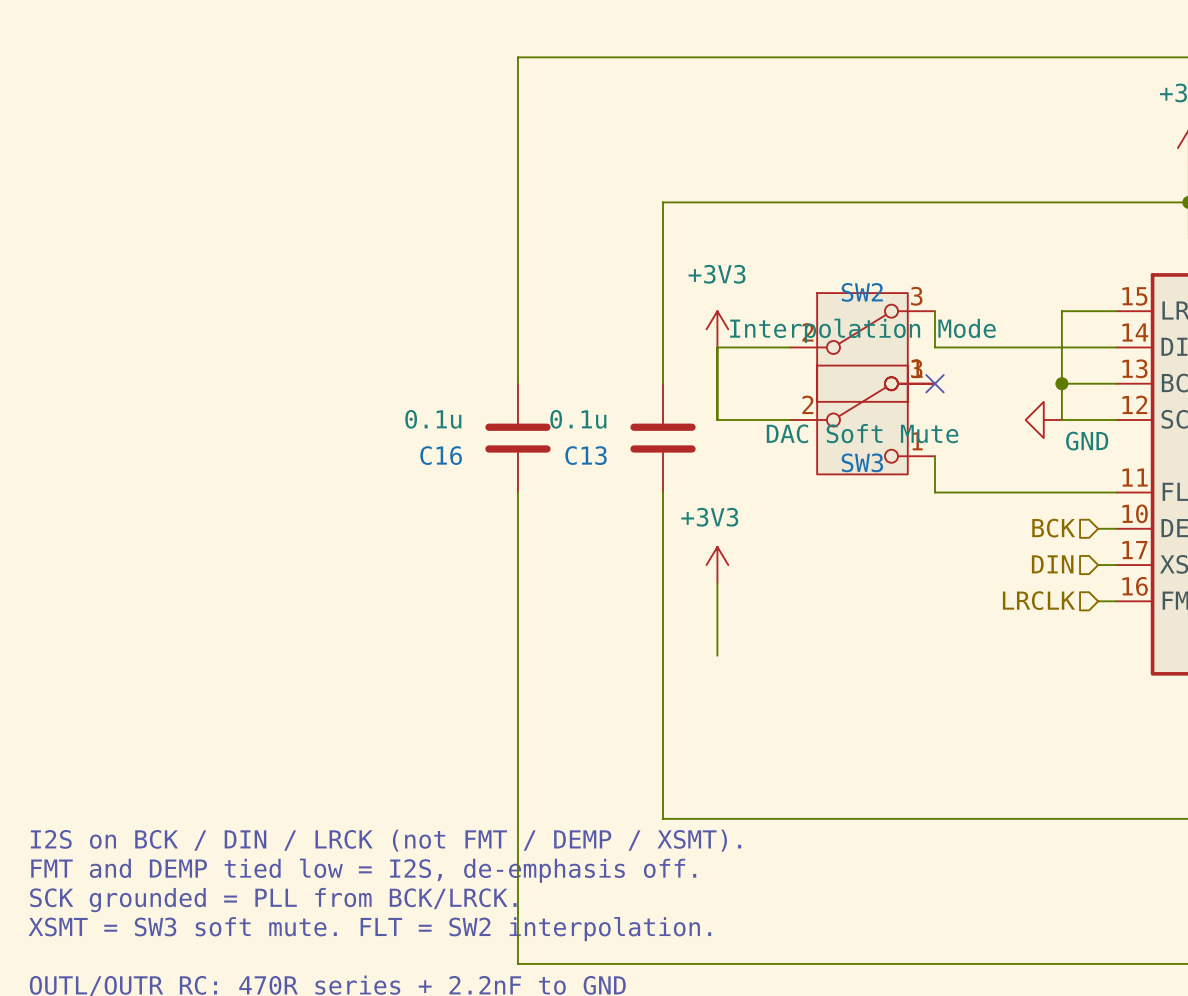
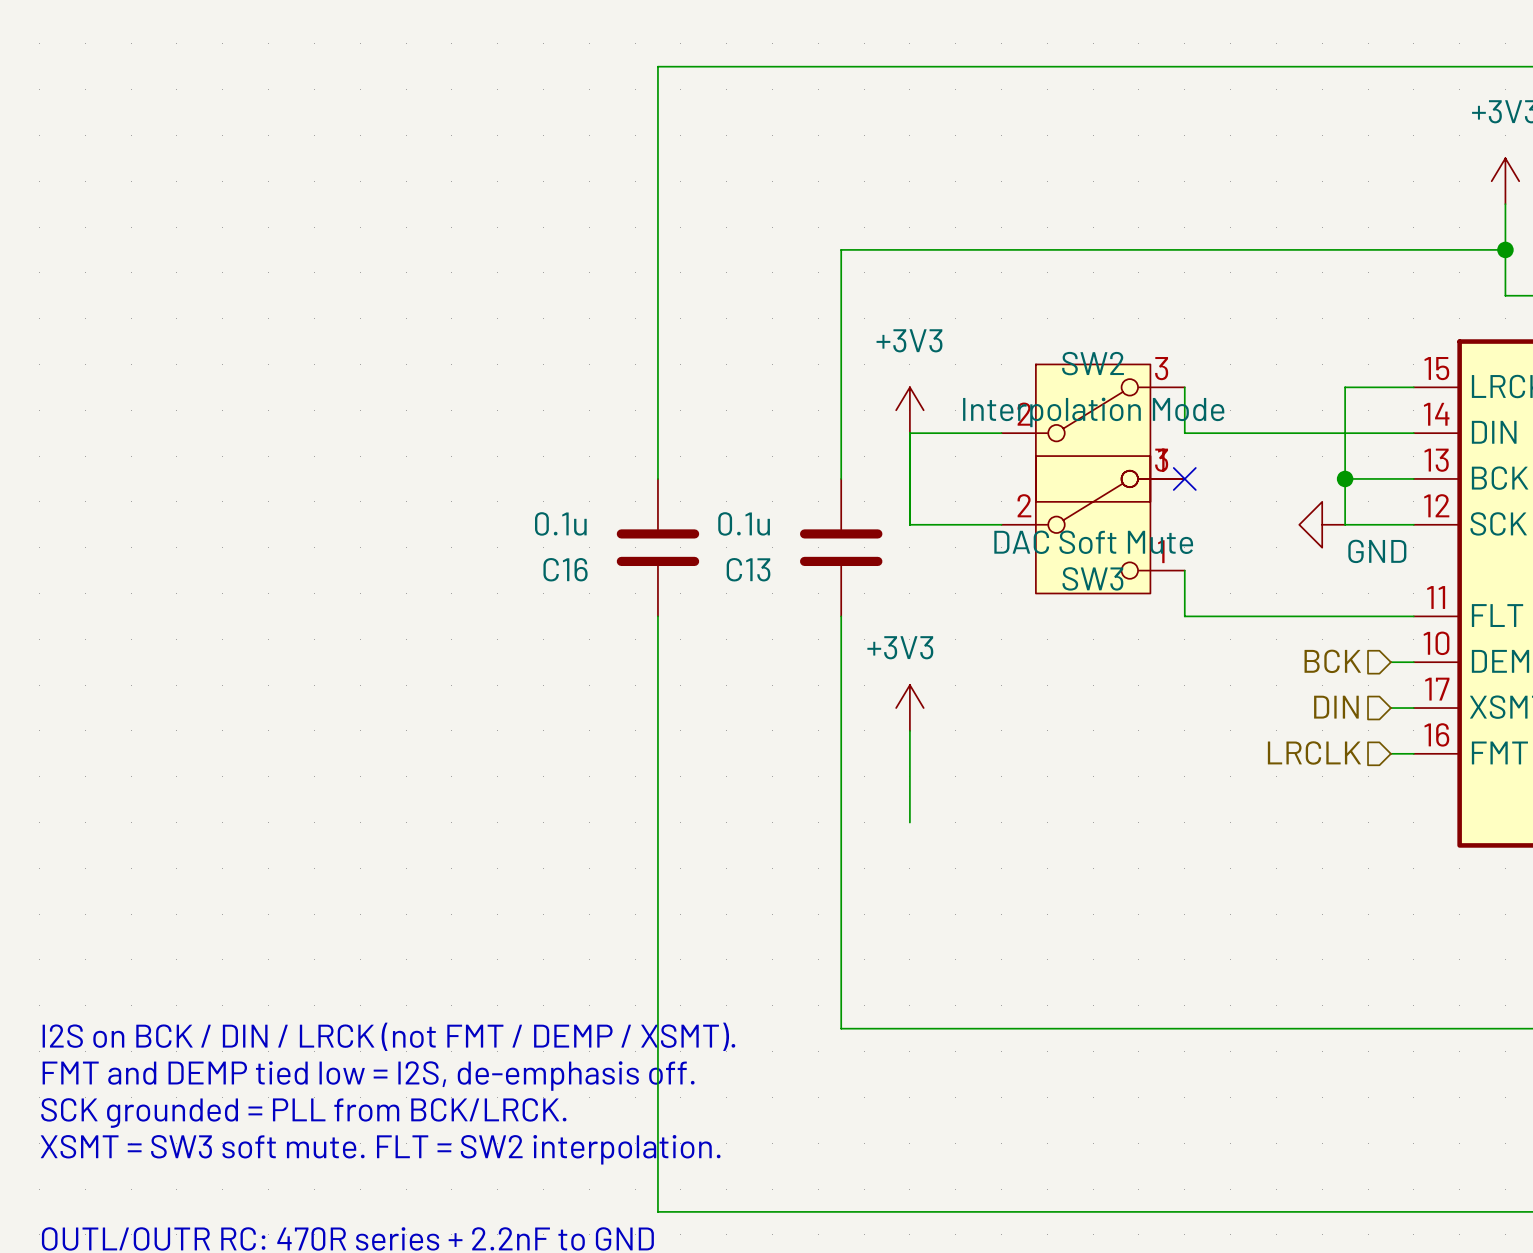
text position: I2S on BCK / DIN / LRCK (not FMT / DEMP / XSMT). (385, 840) -> I2S on BCK / DIN / LRCK (not FMT / DEMP / XSMT). (388, 1036)
text position: FMT and DEMP tied low = I2S, de-emphasis off. (363, 870) -> FMT and DEMP tied low = I2S, de-emphasis off. (368, 1076)
text position: SCK grounded = PLL from BCK/LRCK. (273, 900) -> SCK grounded = PLL from BCK/LRCK. (303, 1113)
text position: XSMT = SW3 soft mute. FLT = SW2 interpolation. (369, 929) -> XSMT = SW3 soft mute. FLT = SW2 interpolation. (380, 1149)

